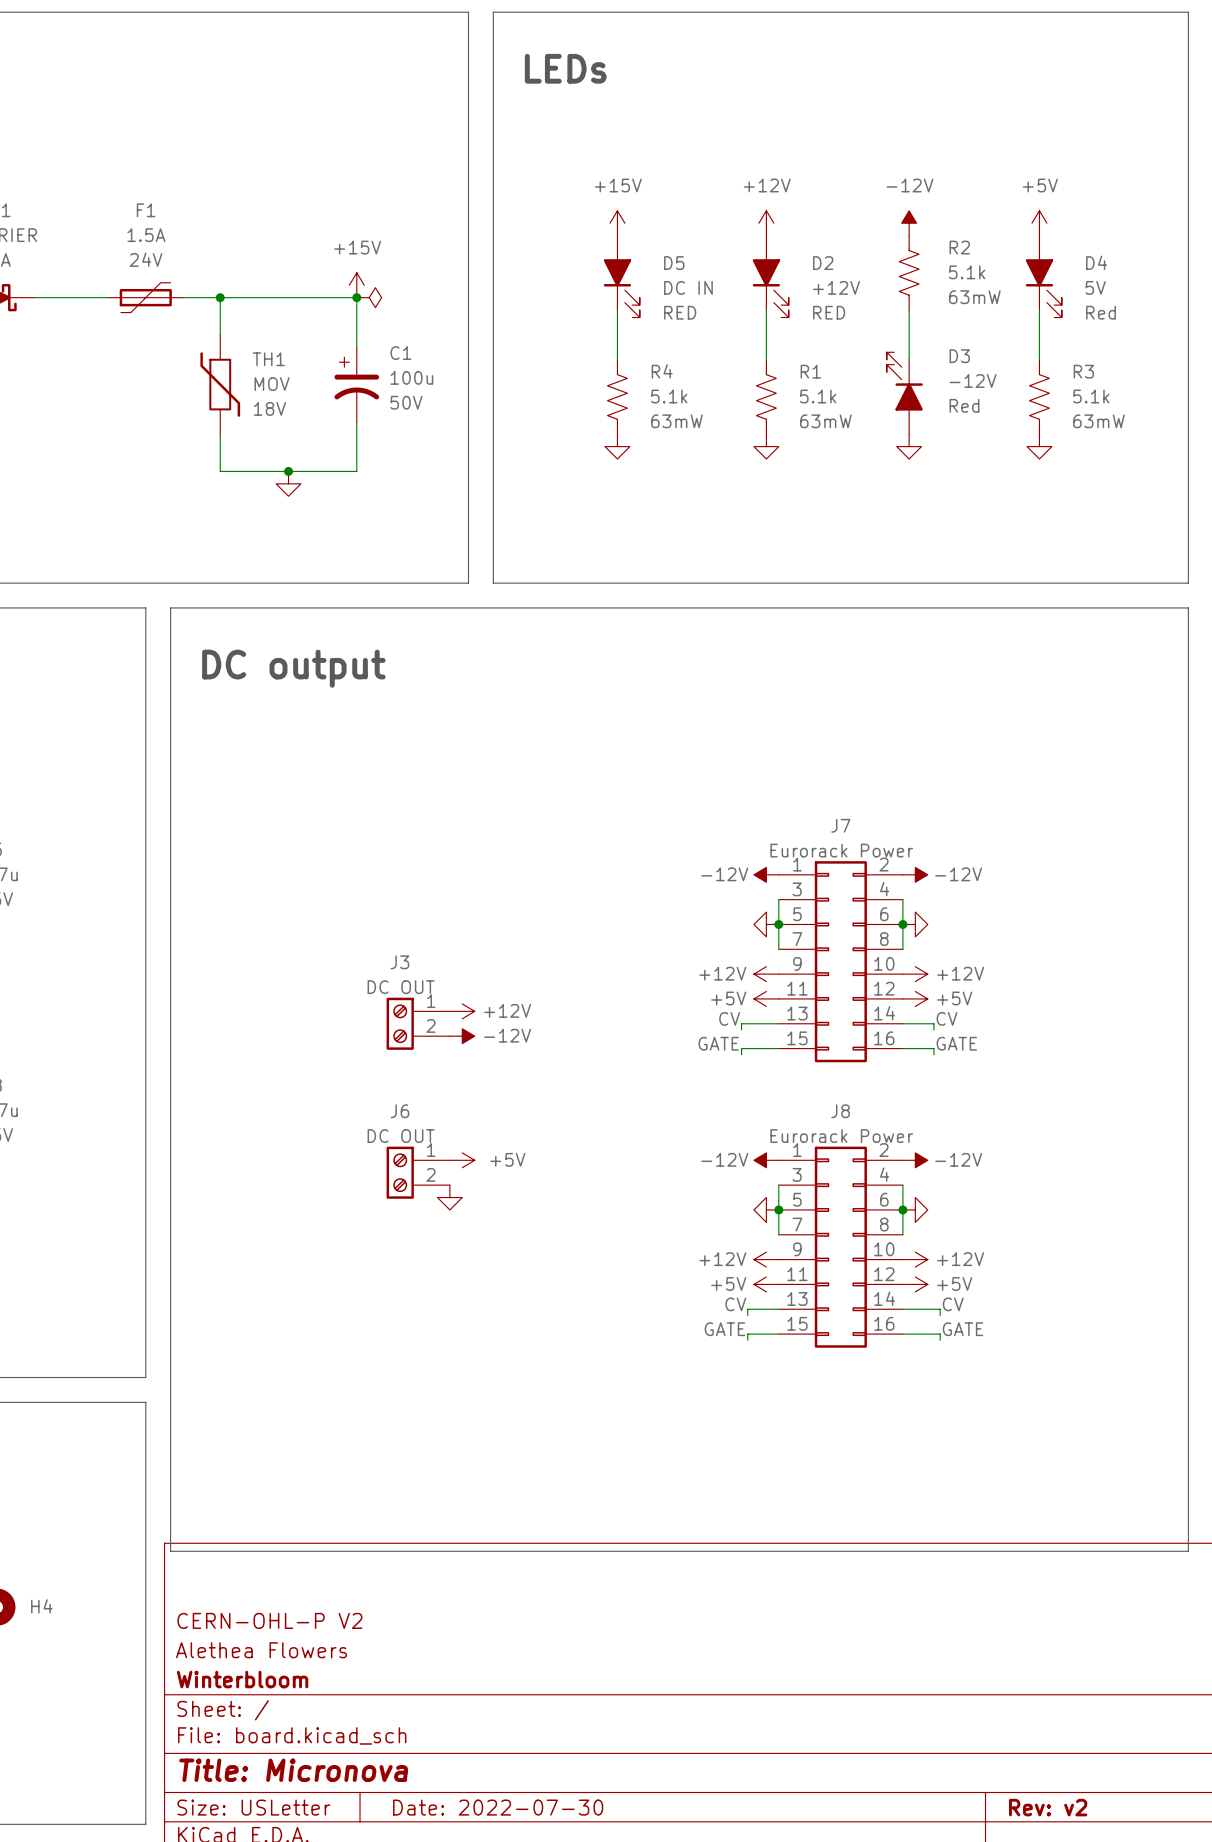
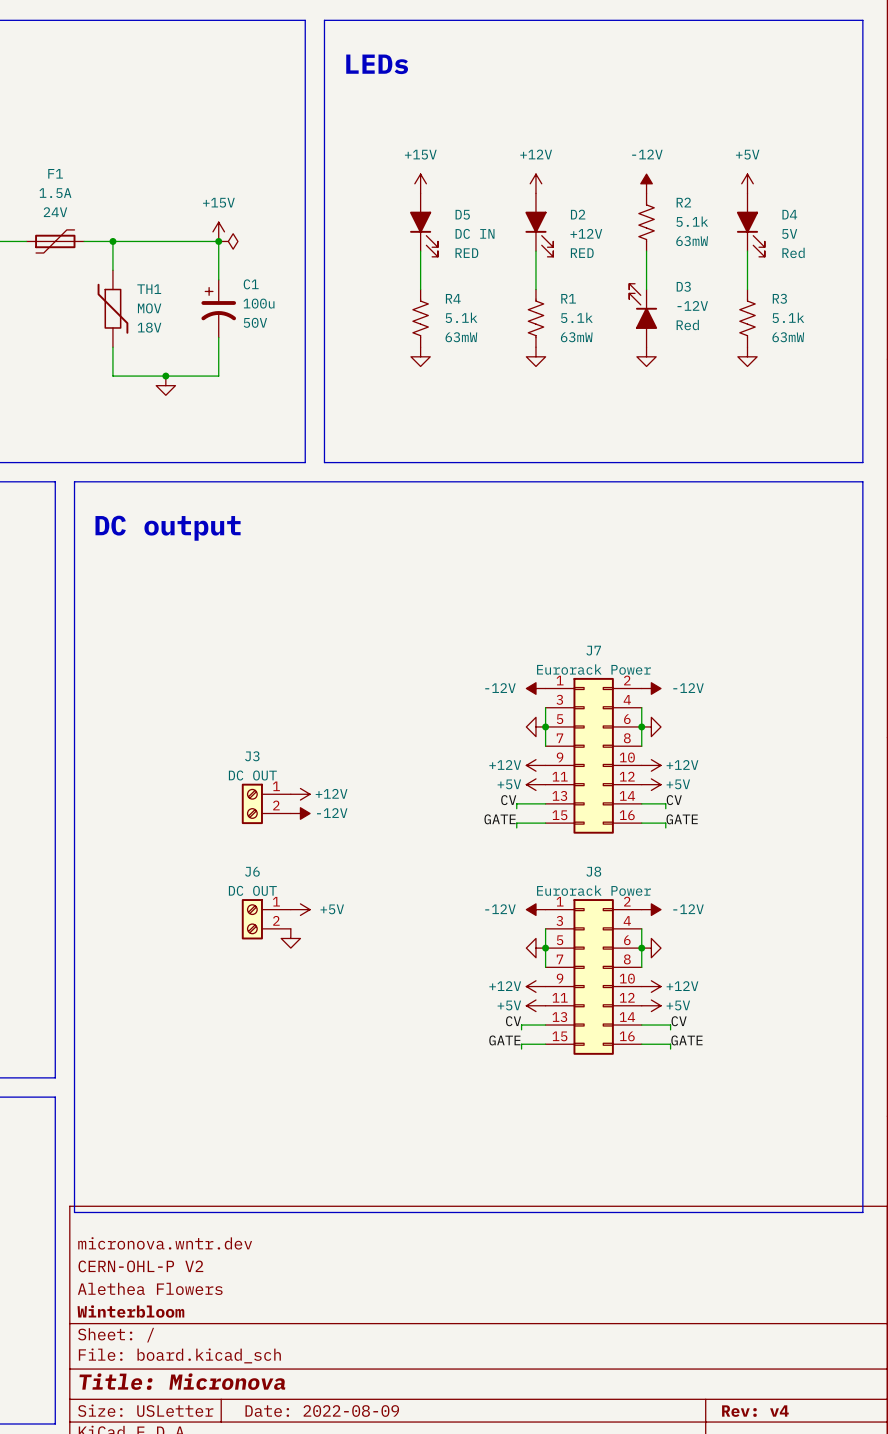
title block: none -> micronova.wntr.dev (165, 1243)
title block: Date: 2022-07-30 (498, 1807) -> Date: 2022-08-09 (322, 1411)
title block: Rev: v2 (1048, 1807) -> Rev: v4 (755, 1411)

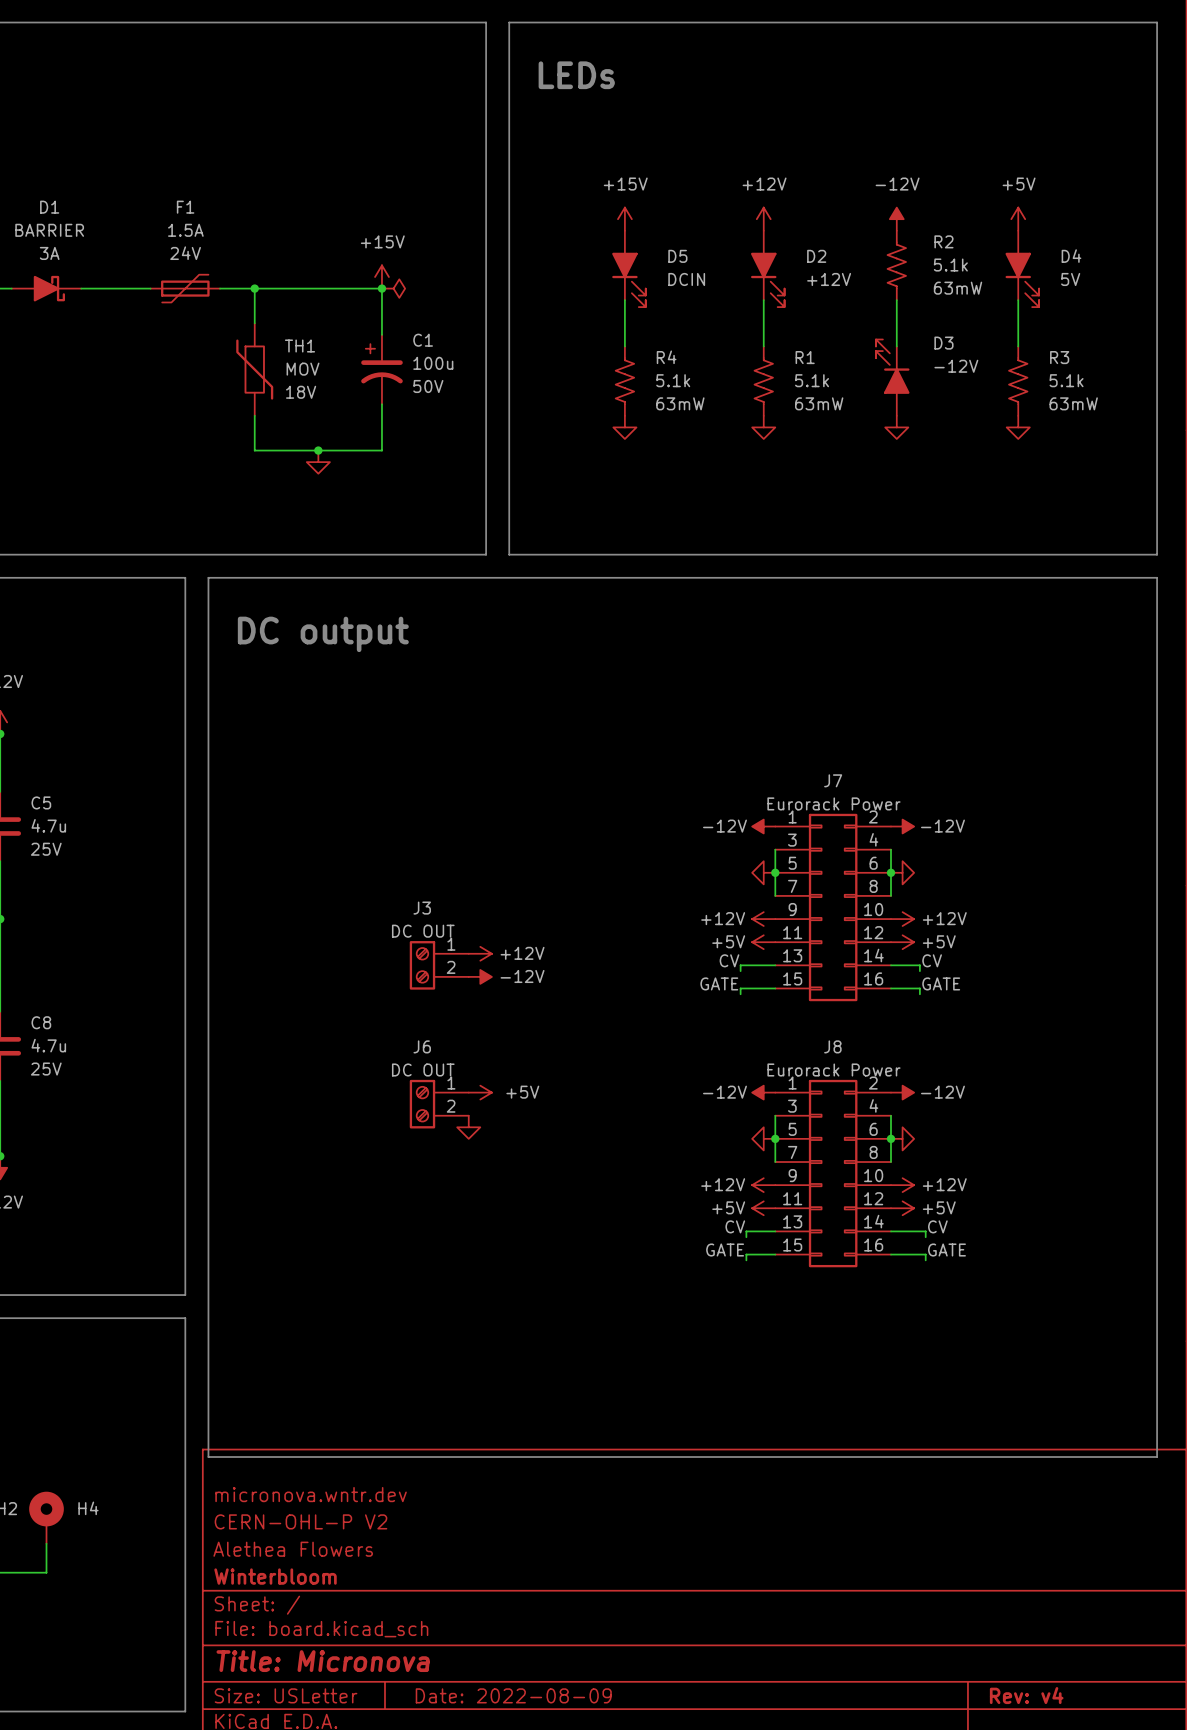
D5 value: DC IN (475, 233) -> DCIN (686, 279)
D4 text: Red (793, 252) -> none
D5 text: RED (466, 253) -> none
D2 text: RED (582, 253) -> none
D3 text: Red (687, 325) -> none

